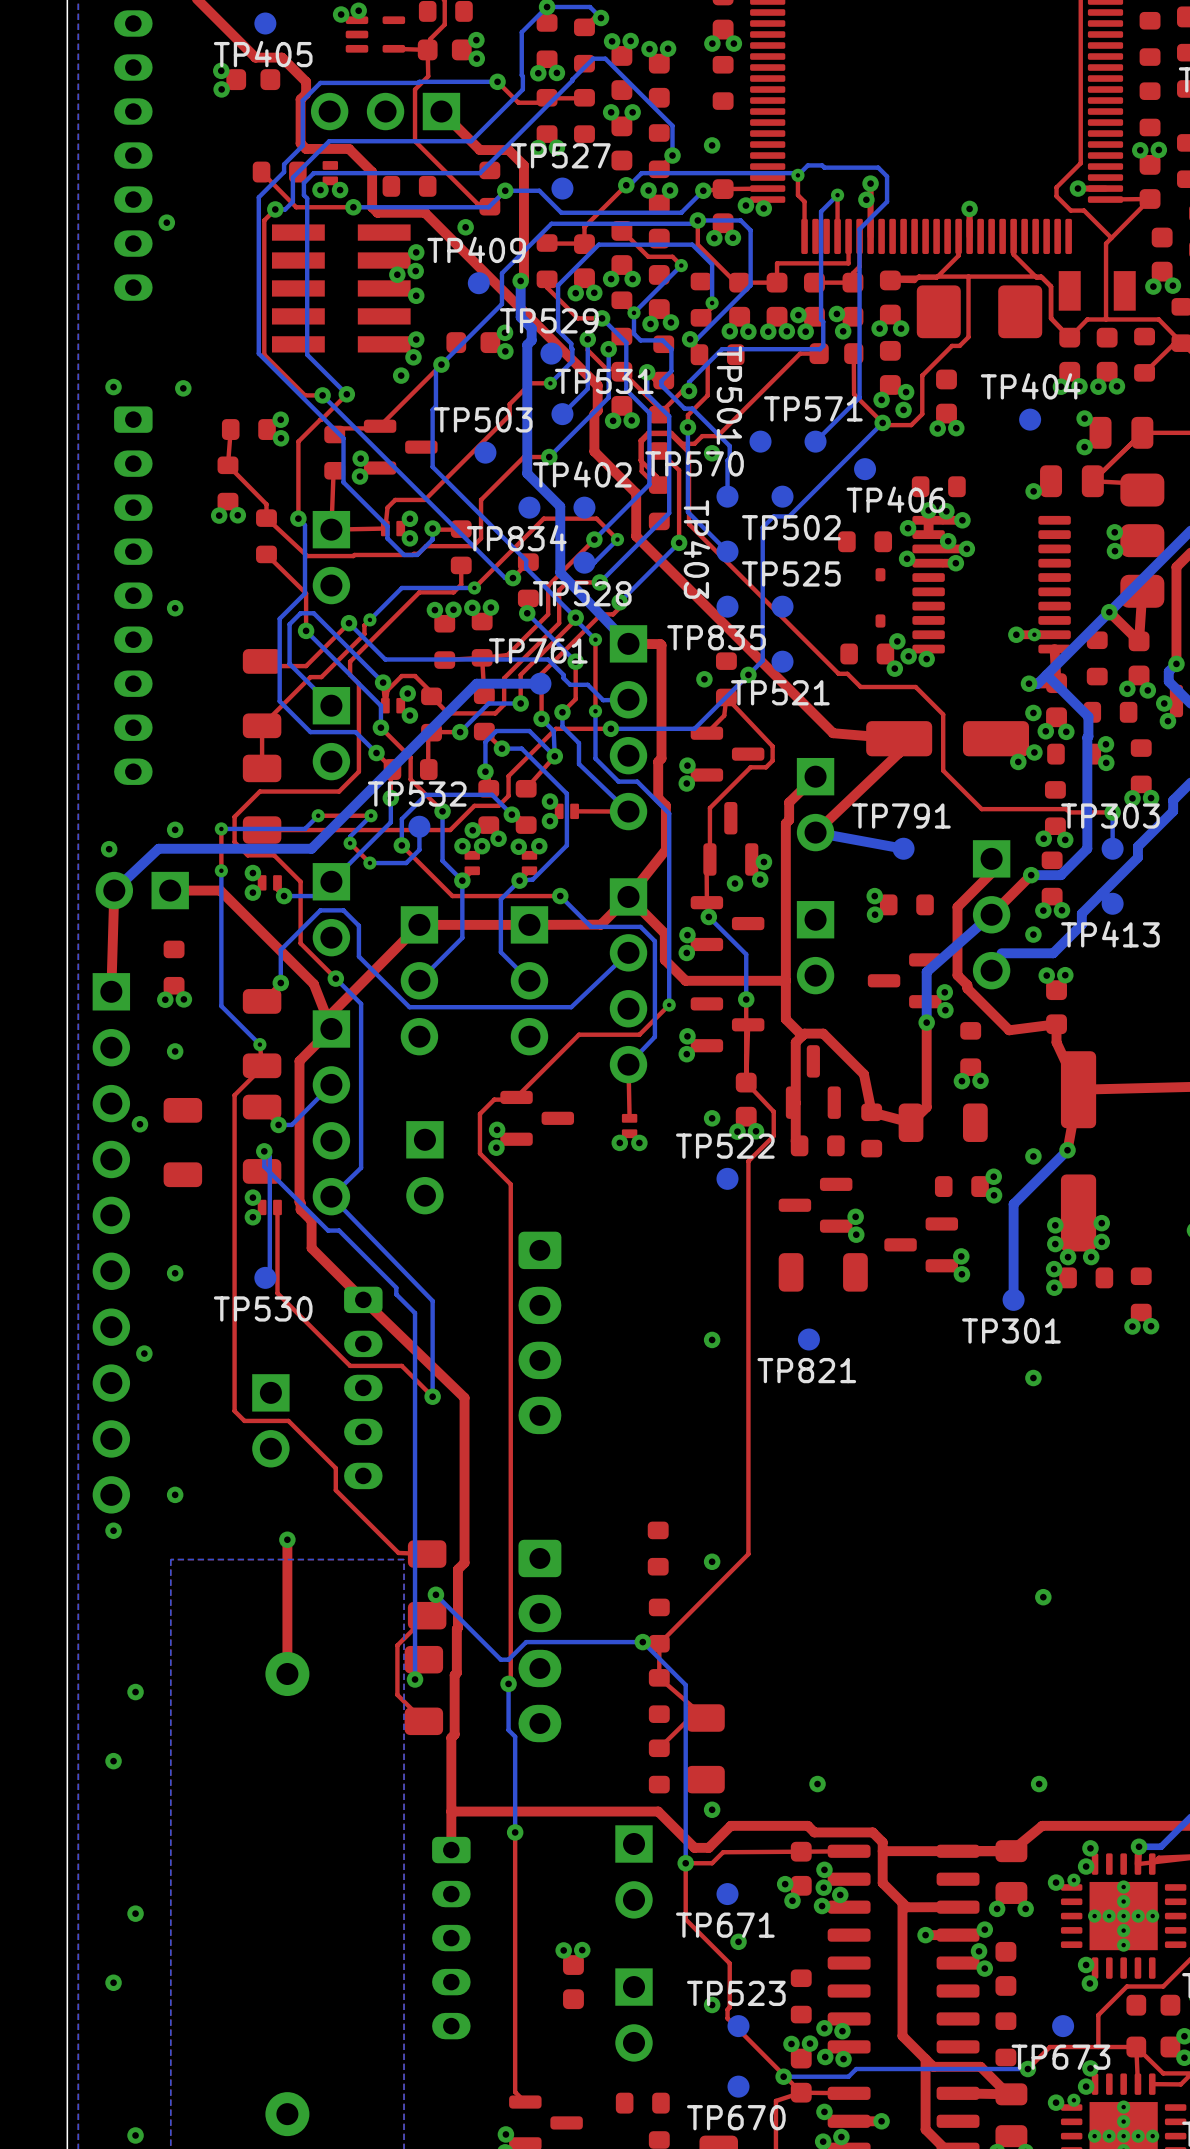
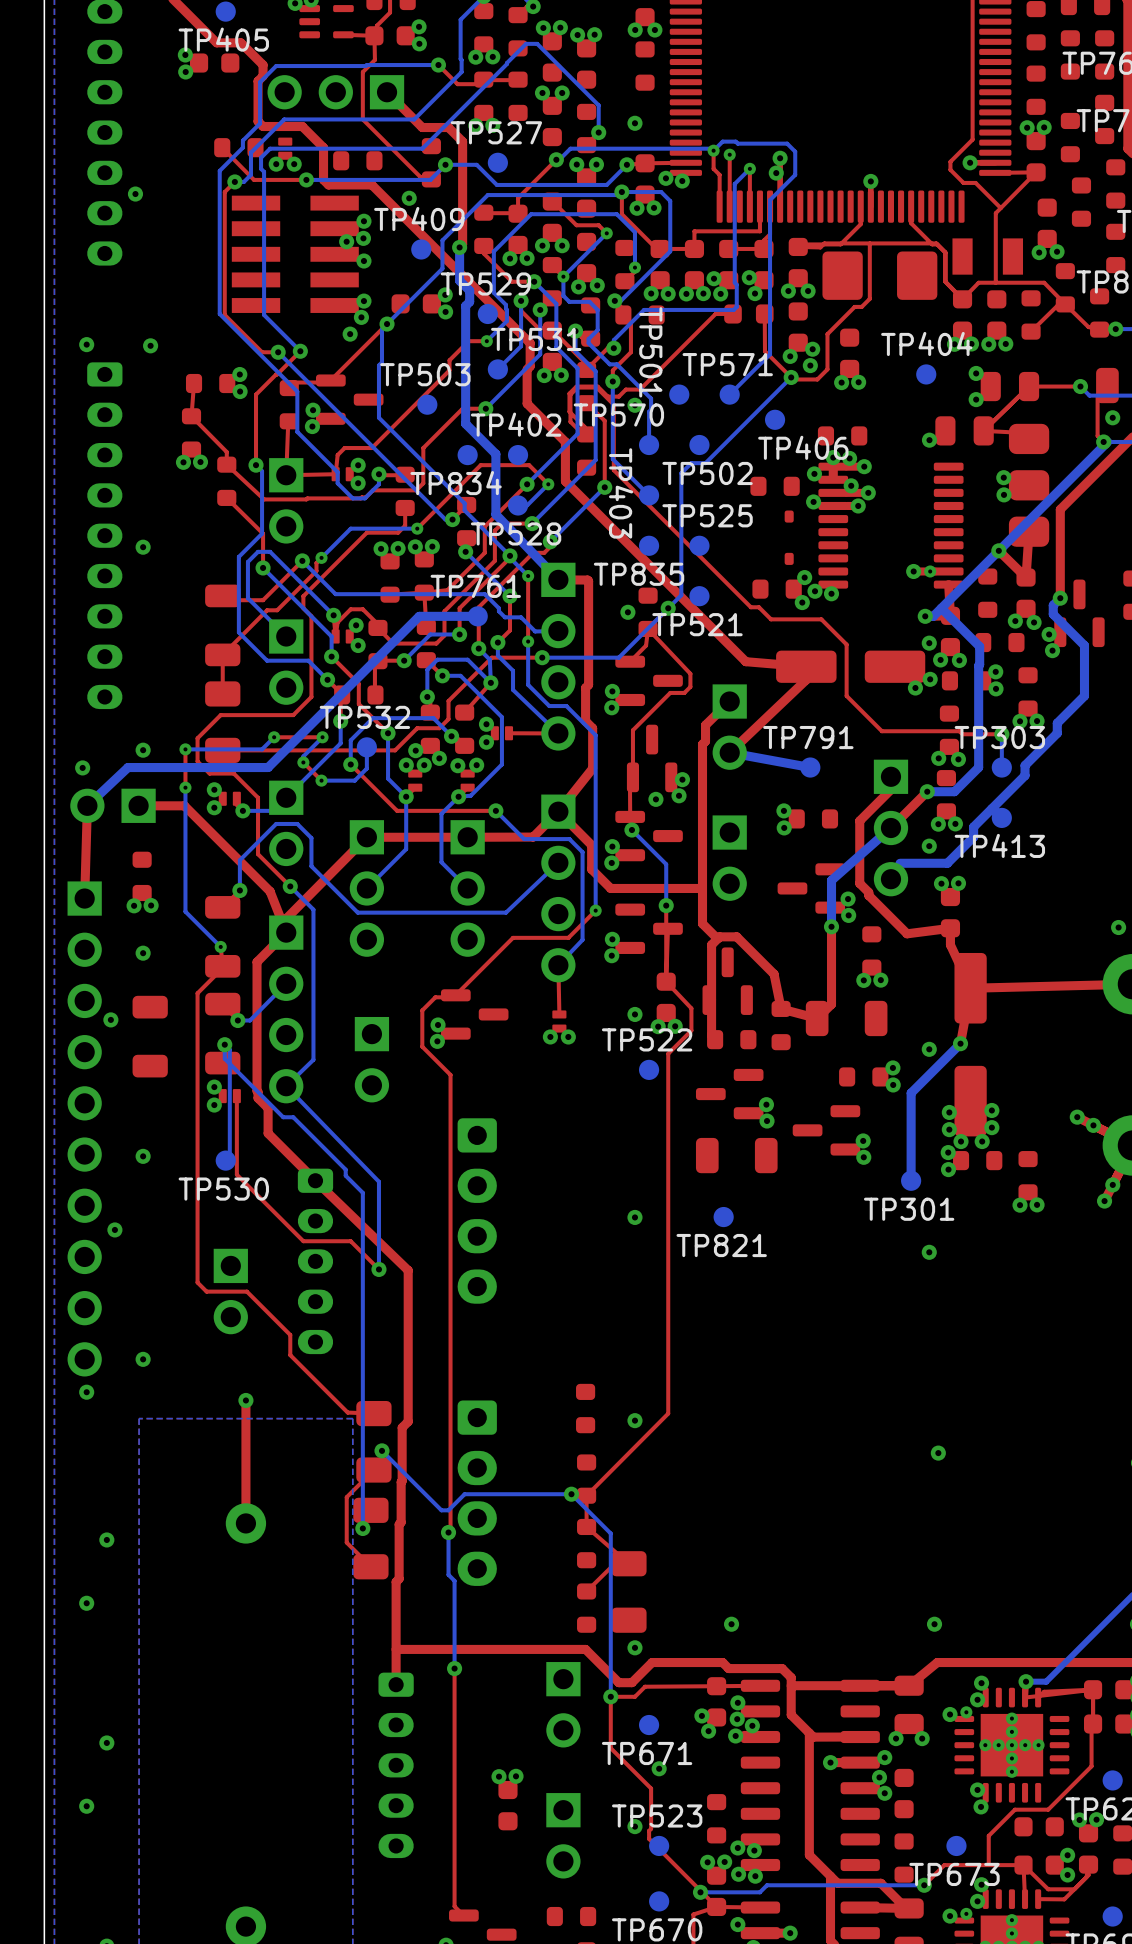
top track: none -> (729, 154) (729, 206)
via: none -> (729, 154)

